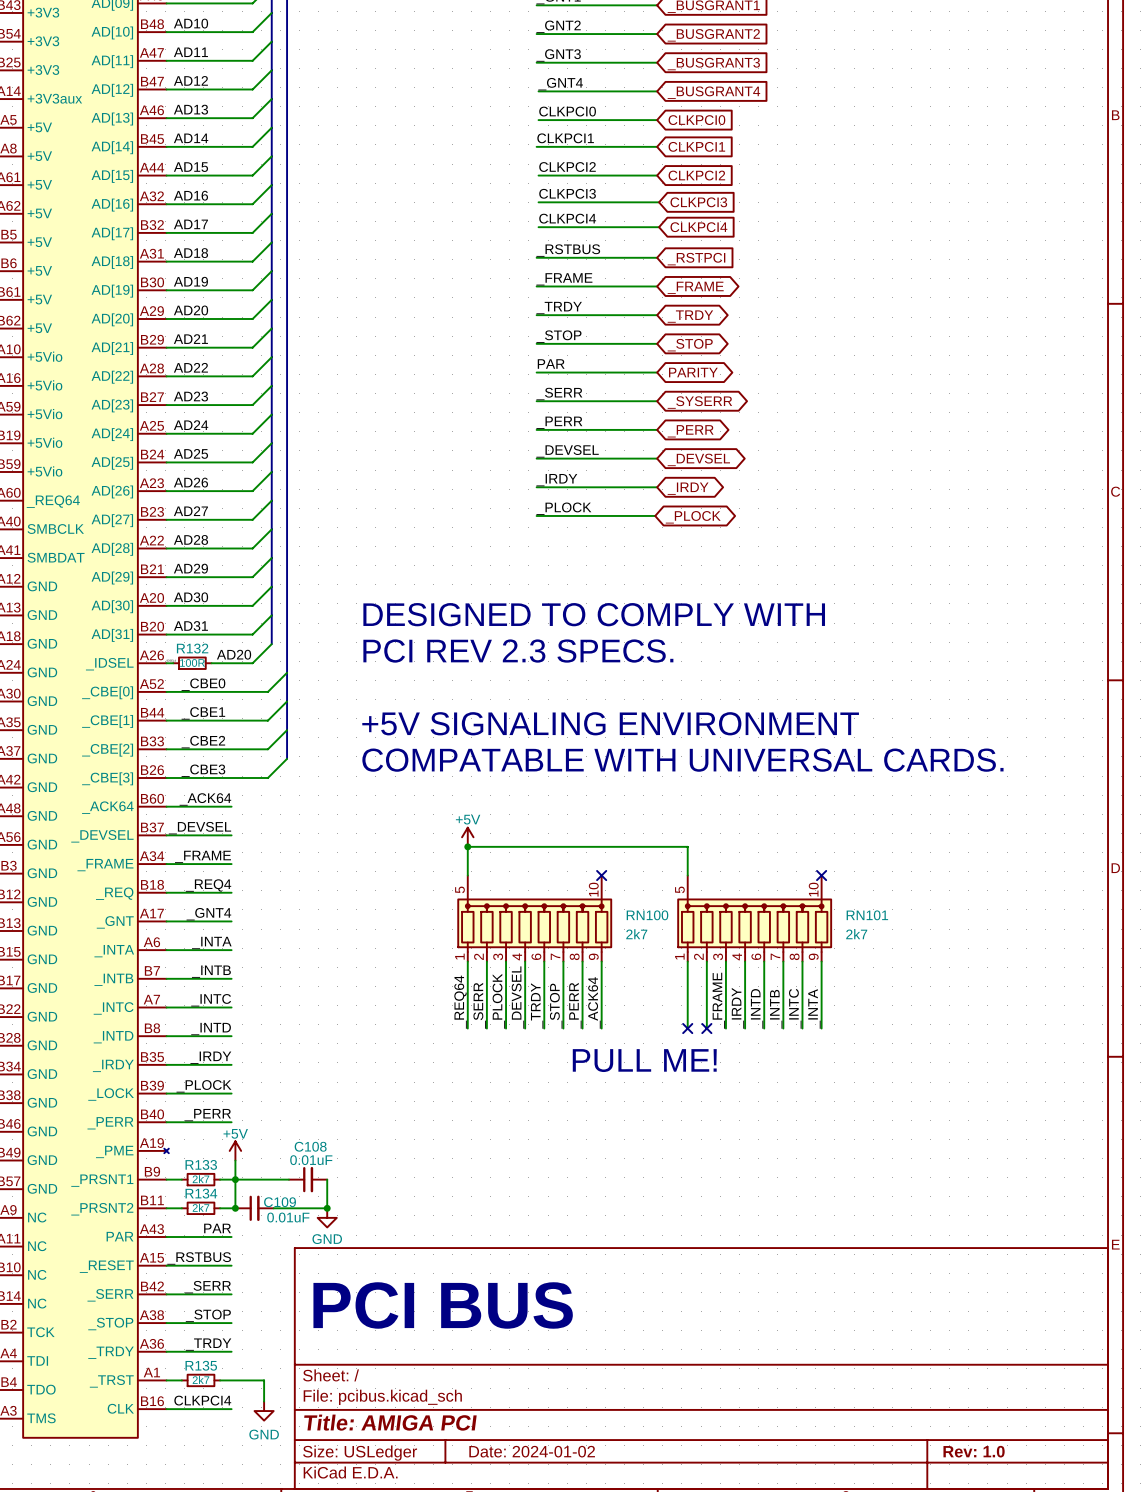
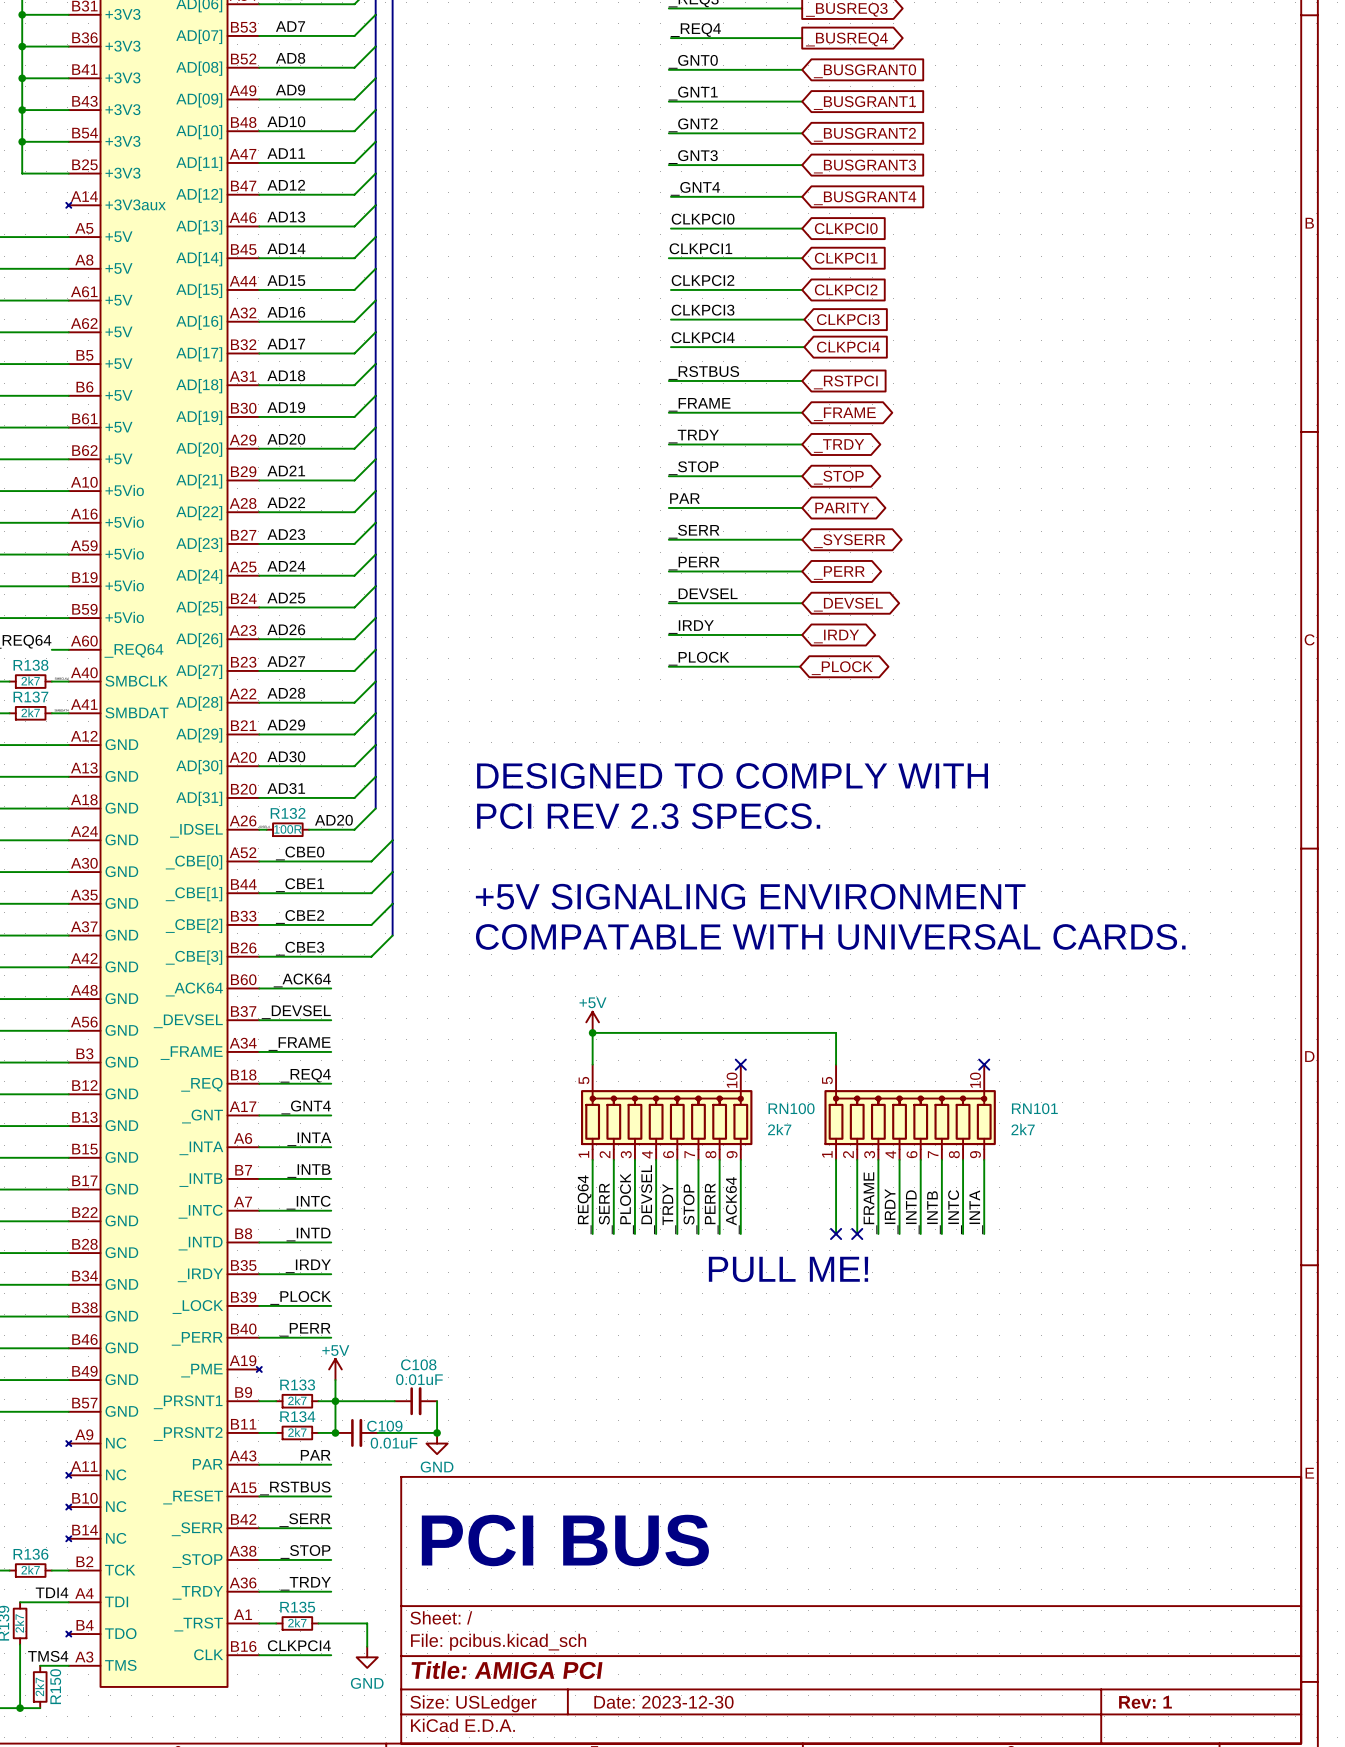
title block: Date: 2024-01-02 (532, 1451) -> Date: 2023-12-30 (663, 1702)
title block: Rev: 1.0 (974, 1451) -> Rev: 1 (1145, 1702)

